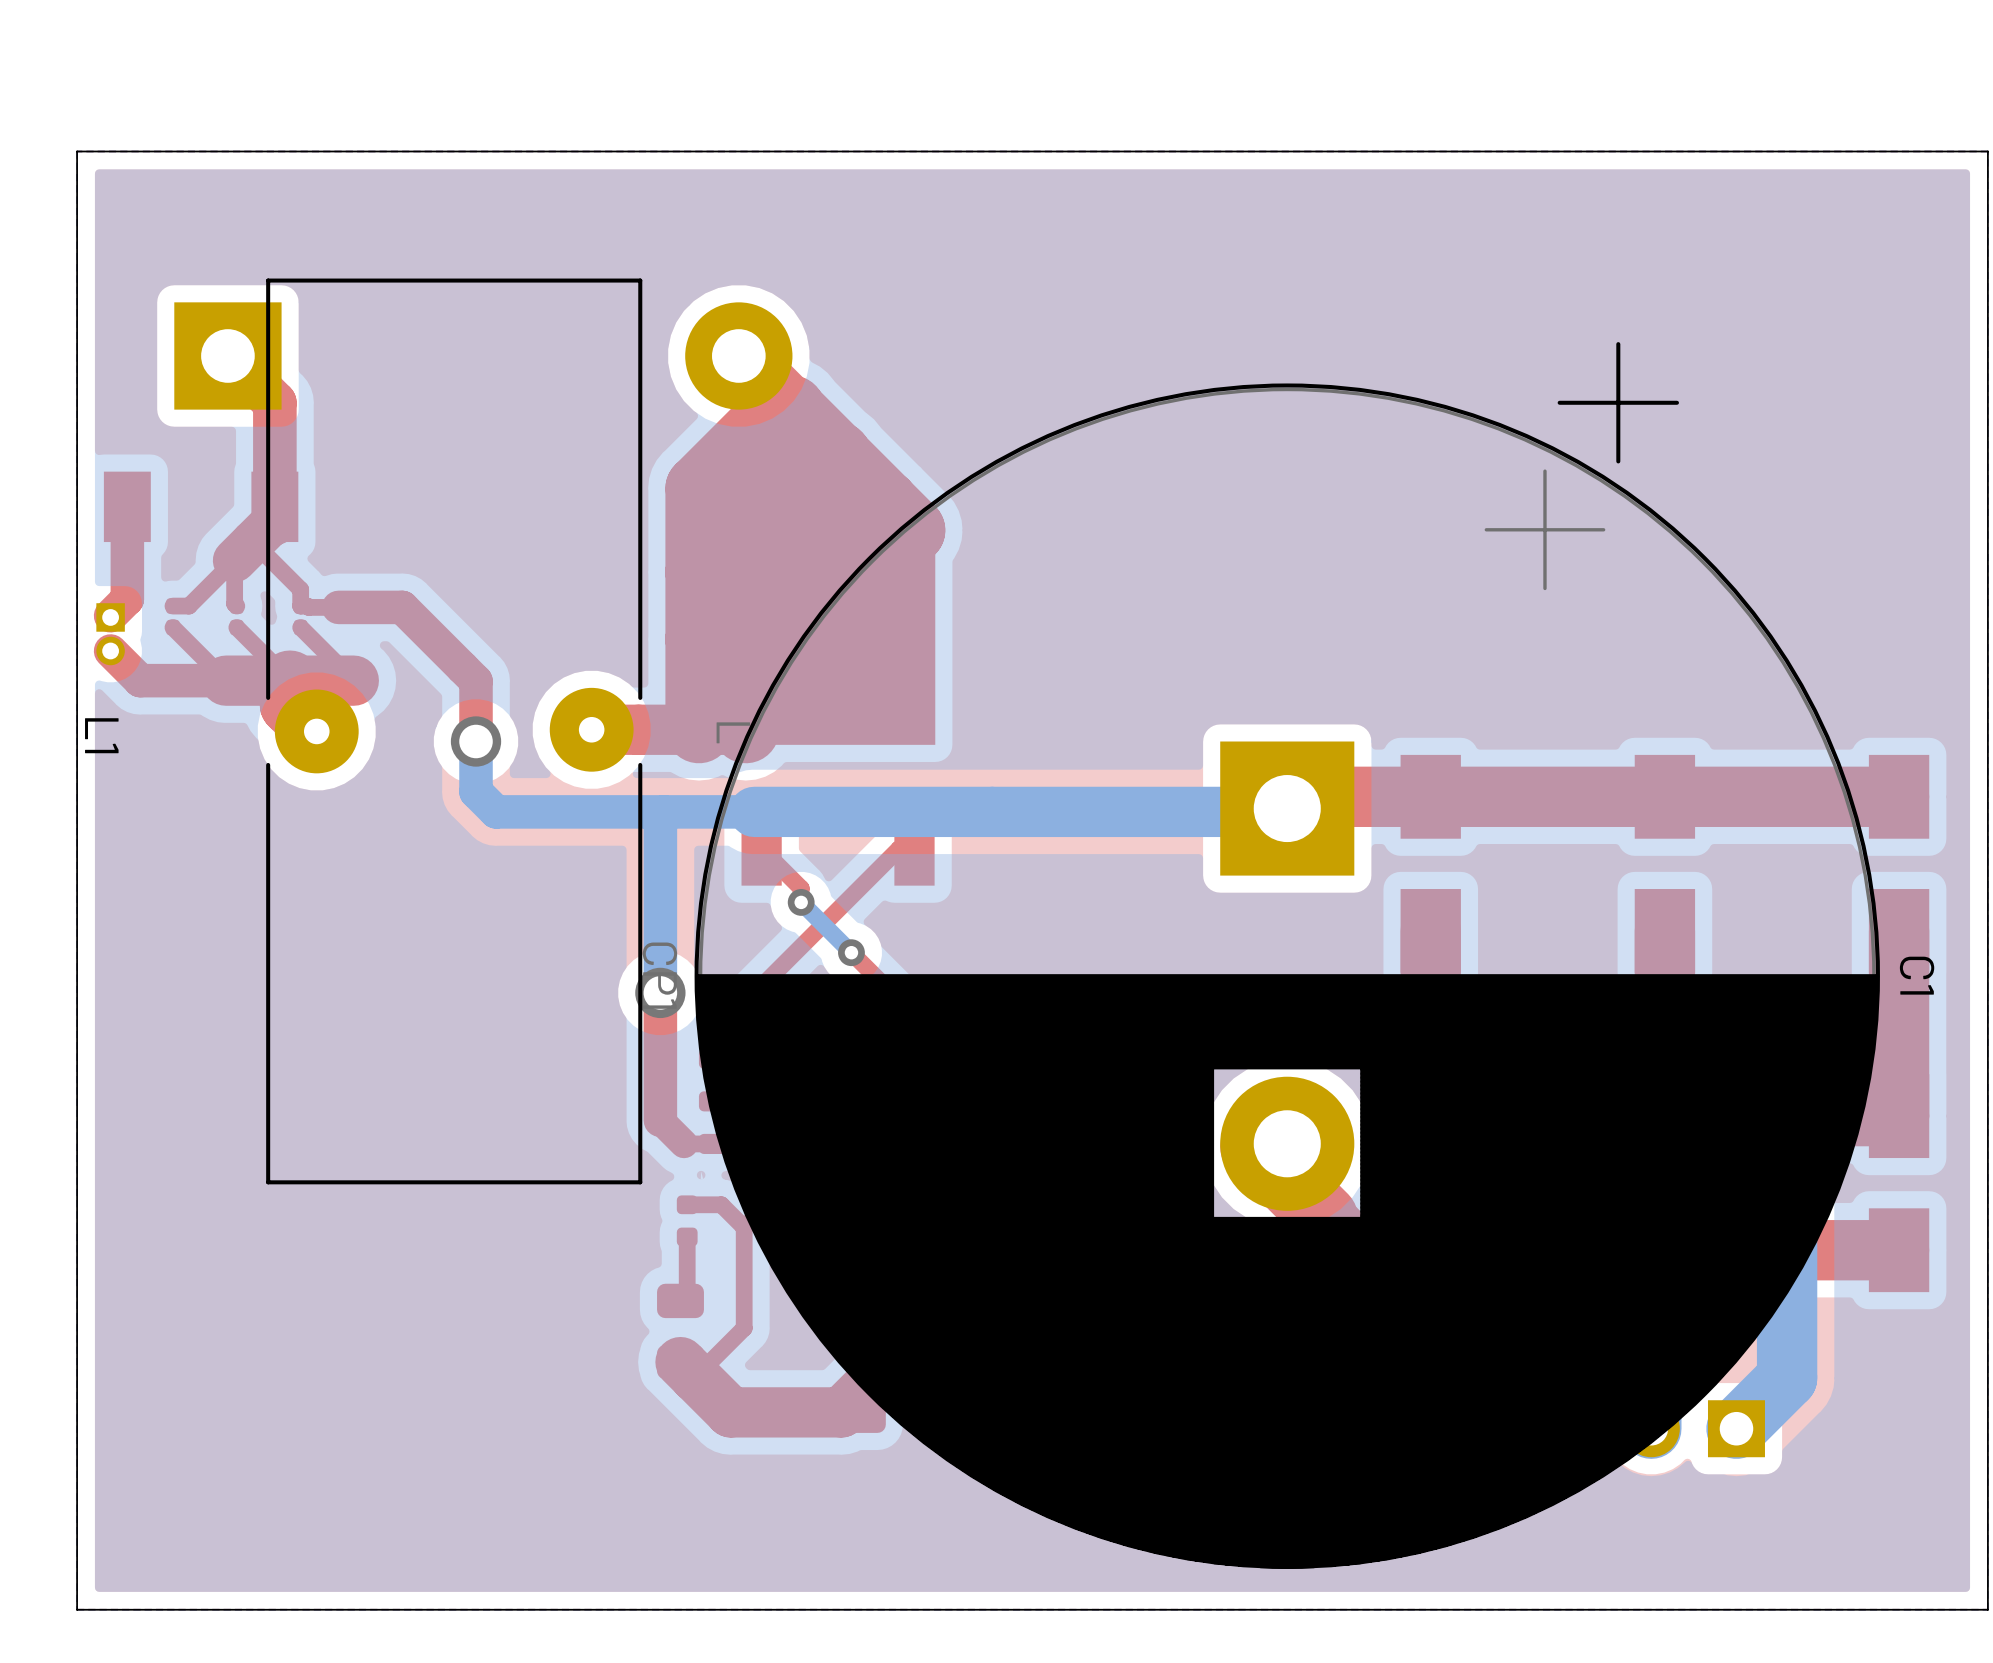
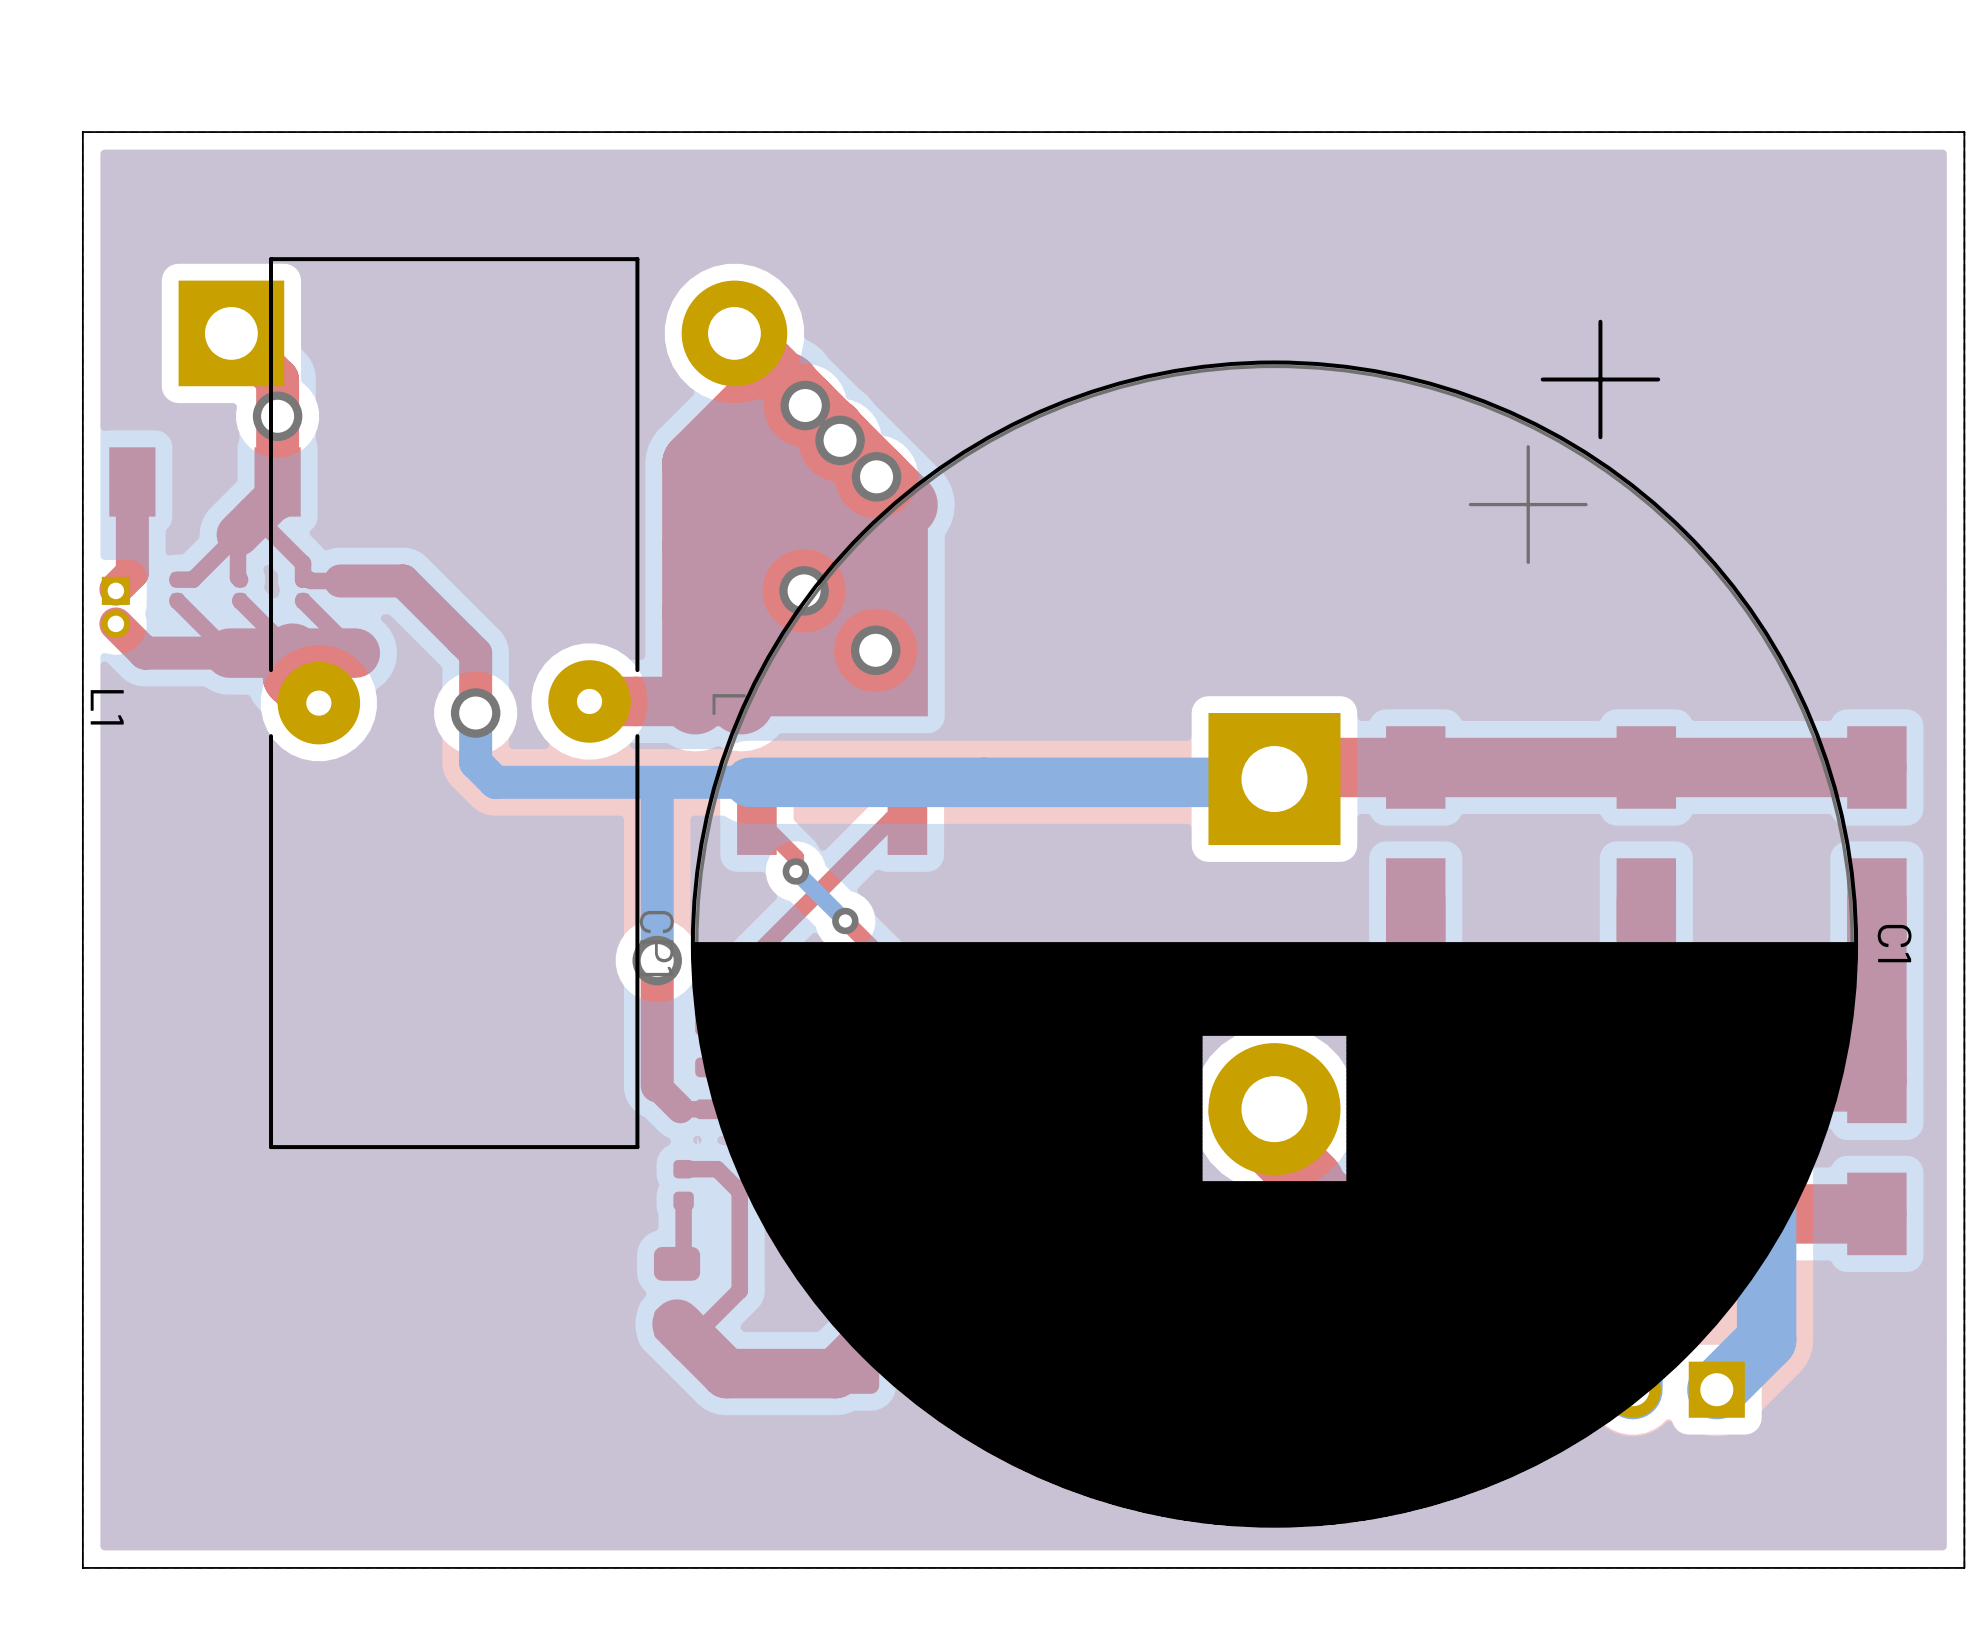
via: none -> (805, 405)
via: none -> (277, 416)
via: none -> (840, 440)
via: none -> (876, 476)
via: none -> (804, 590)
via: none -> (875, 650)

